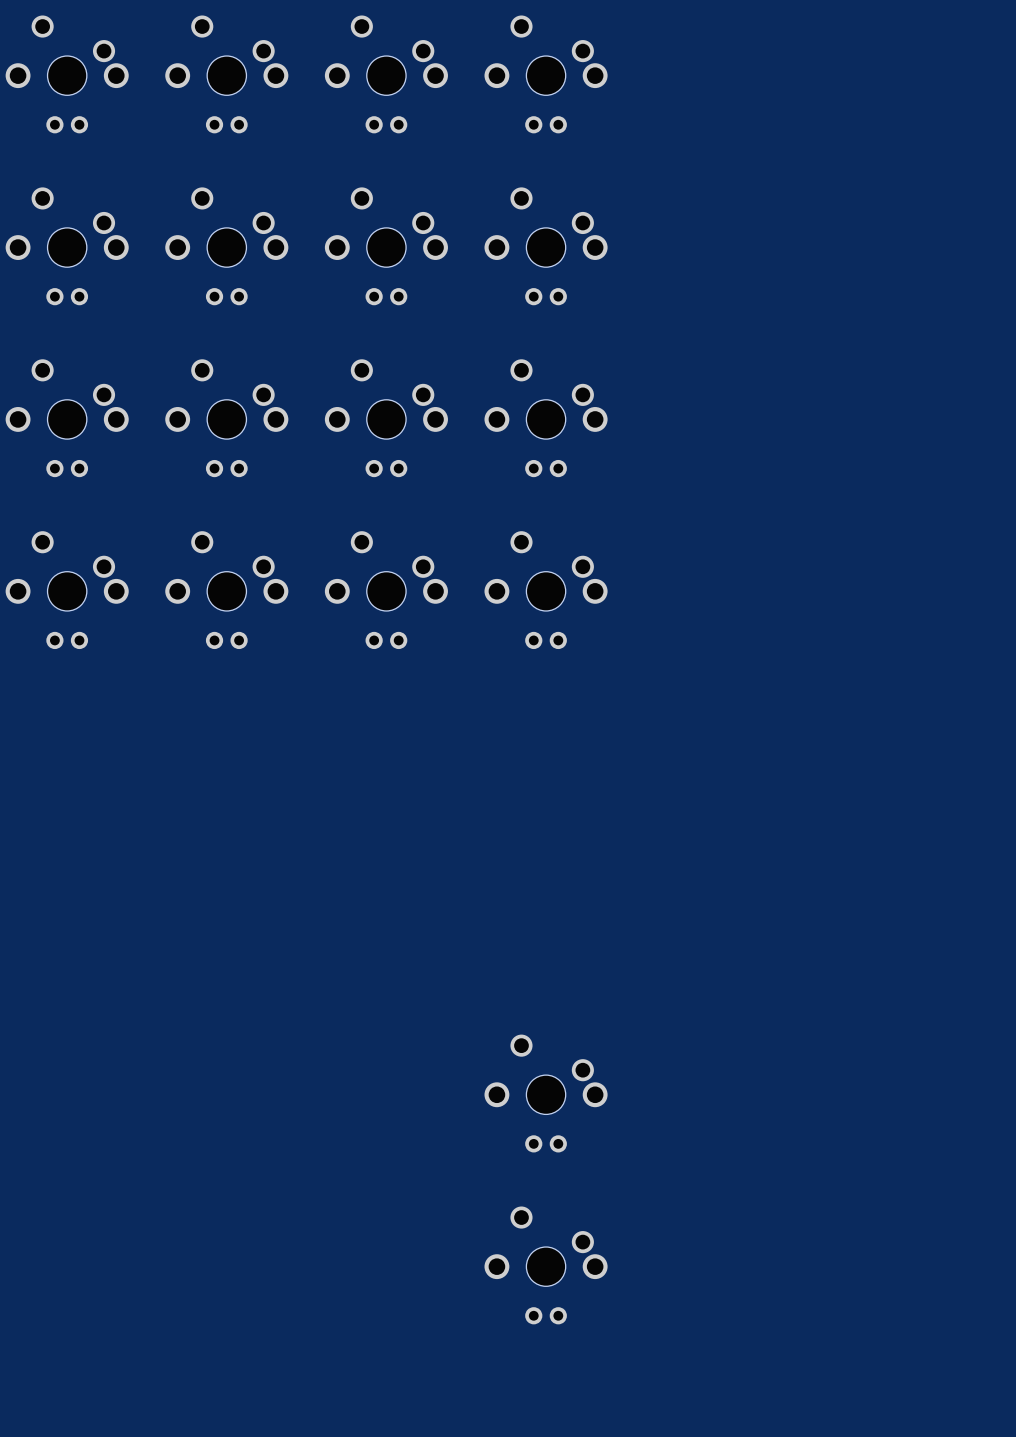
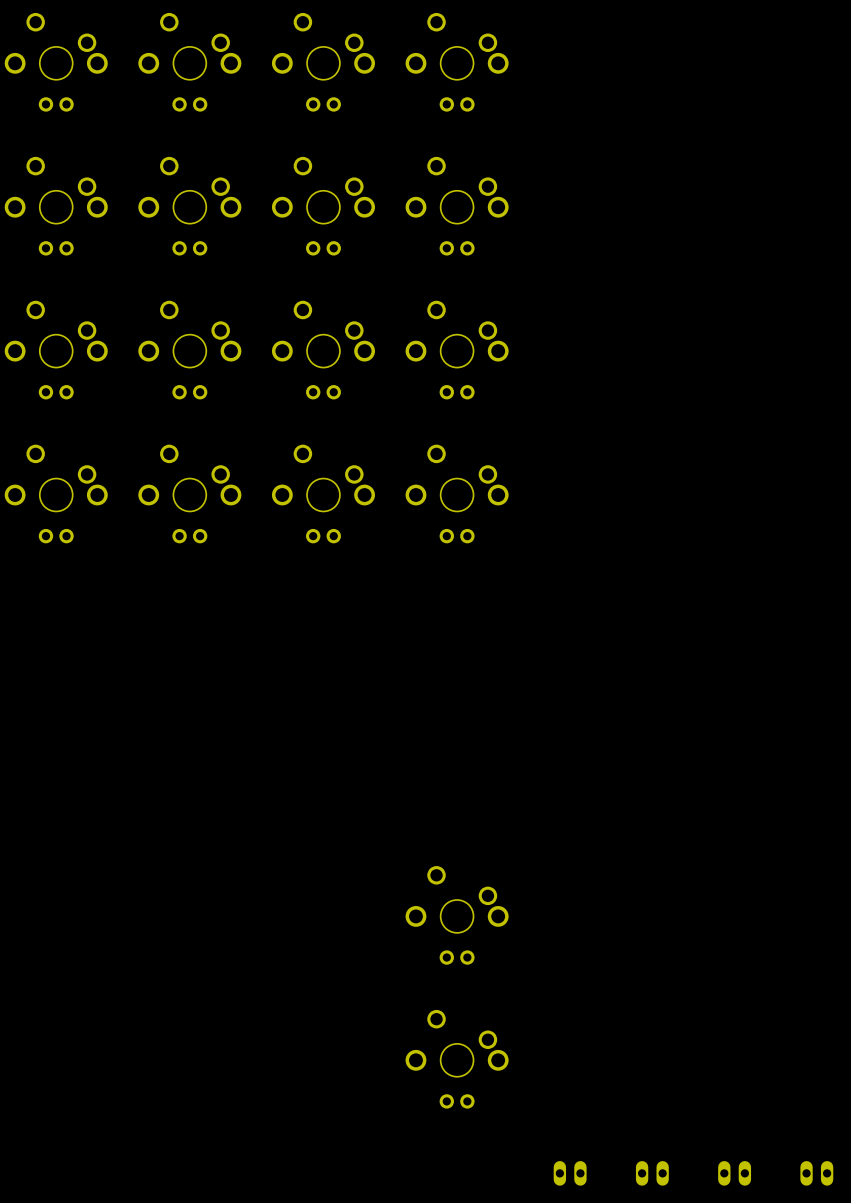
part: none -> (570, 1173)
part: none -> (652, 1173)
part: none -> (734, 1173)
part: none -> (816, 1173)

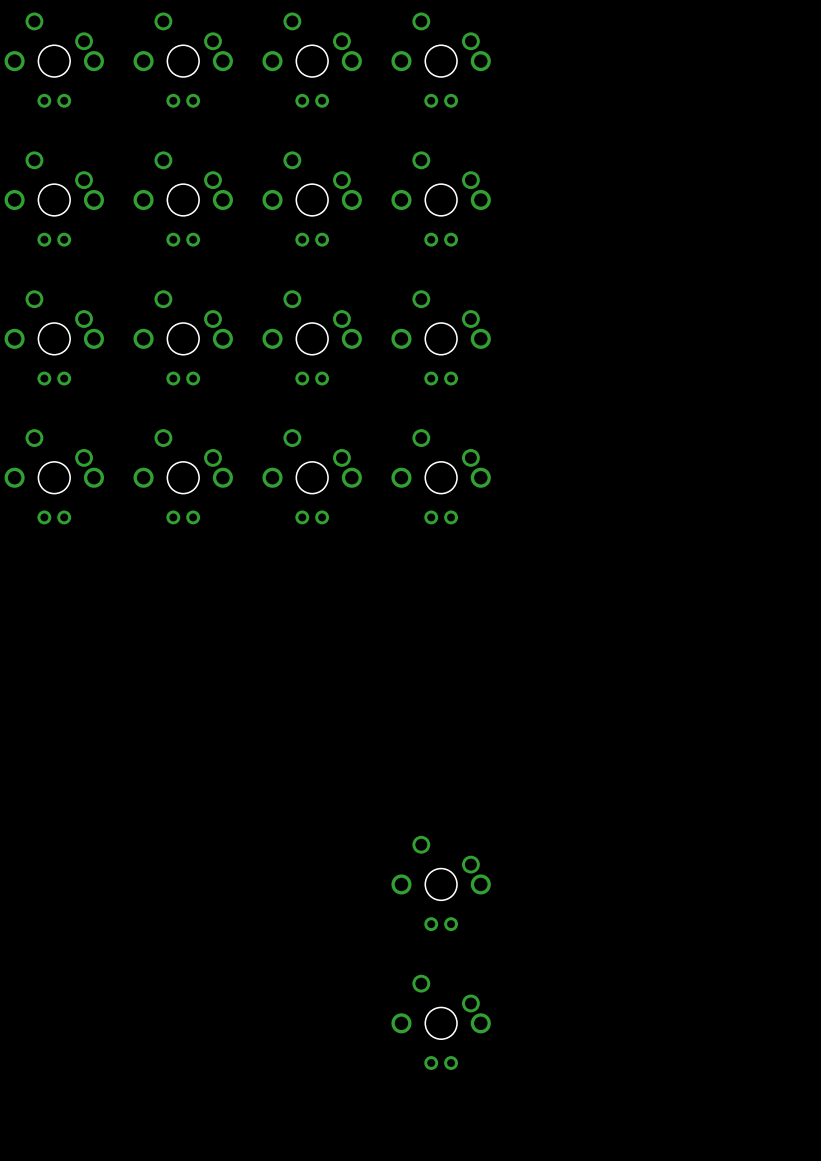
part: (570, 1173) -> none
part: (652, 1173) -> none
part: (734, 1173) -> none
part: (816, 1173) -> none

